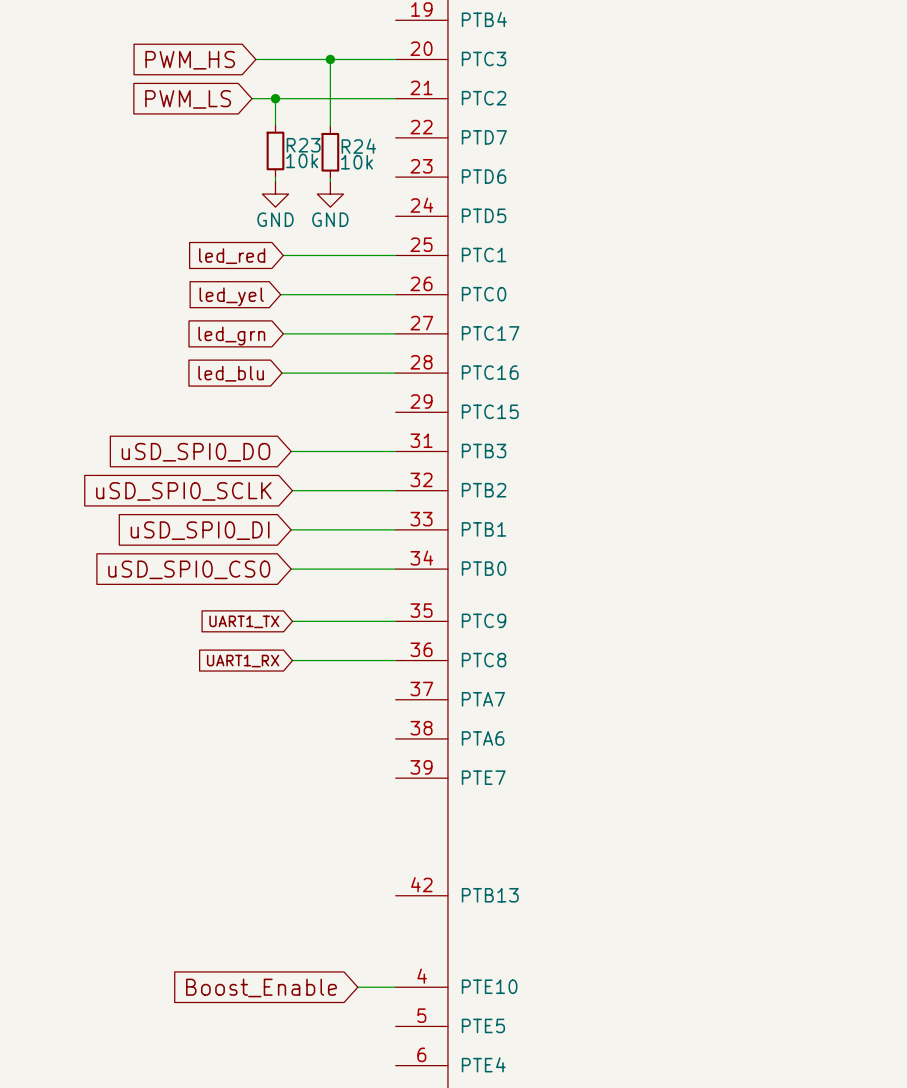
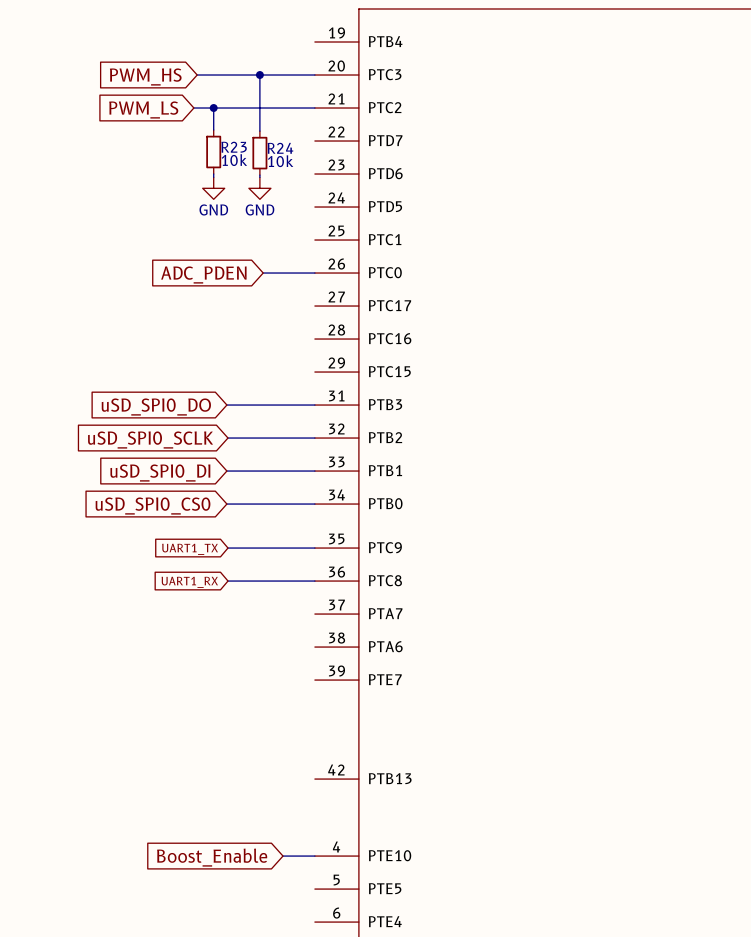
wire: (283, 255) (395, 255) -> none
global label: led_red (232, 256) -> none
wire: (280, 294) (334, 294) -> none
global label: none -> ADC_PDEN (203, 274)
global label: led_yel (231, 296) -> none
wire: (283, 333) (395, 333) -> none
global label: led_grn (231, 336) -> none
global label: led_blu (231, 373) -> none
wire: (282, 373) (395, 373) -> none

